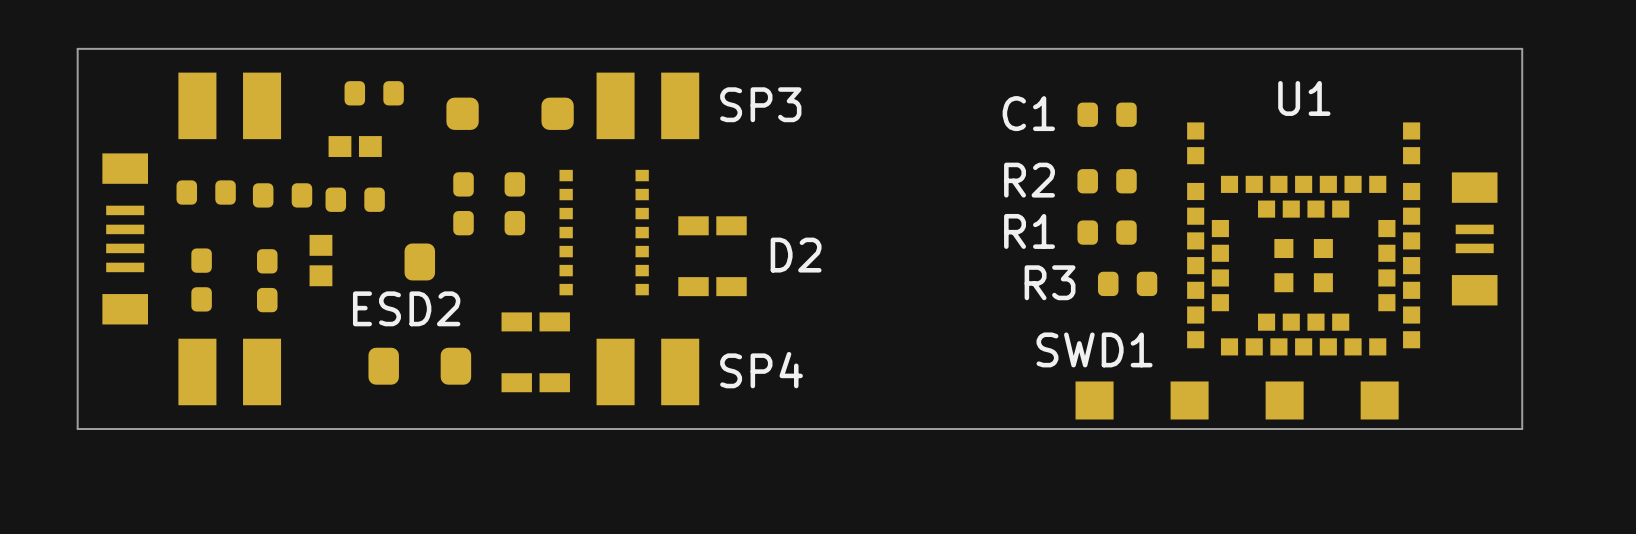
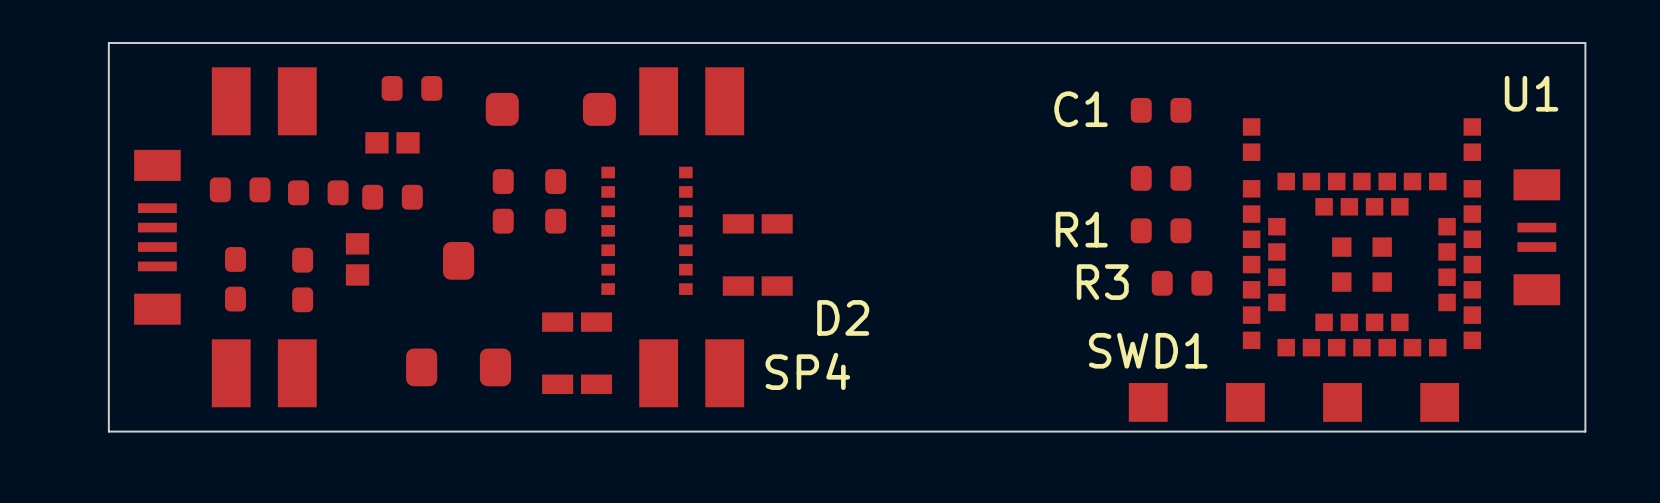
U1 name position: U1 (1304, 98) -> U1 (1531, 93)
SP3 name: SP3 (760, 104) -> none
R2 name: R2 (1029, 180) -> none
D2 name position: D2 (796, 255) -> D2 (843, 317)
ESD2 name: ESD2 (406, 308) -> none

